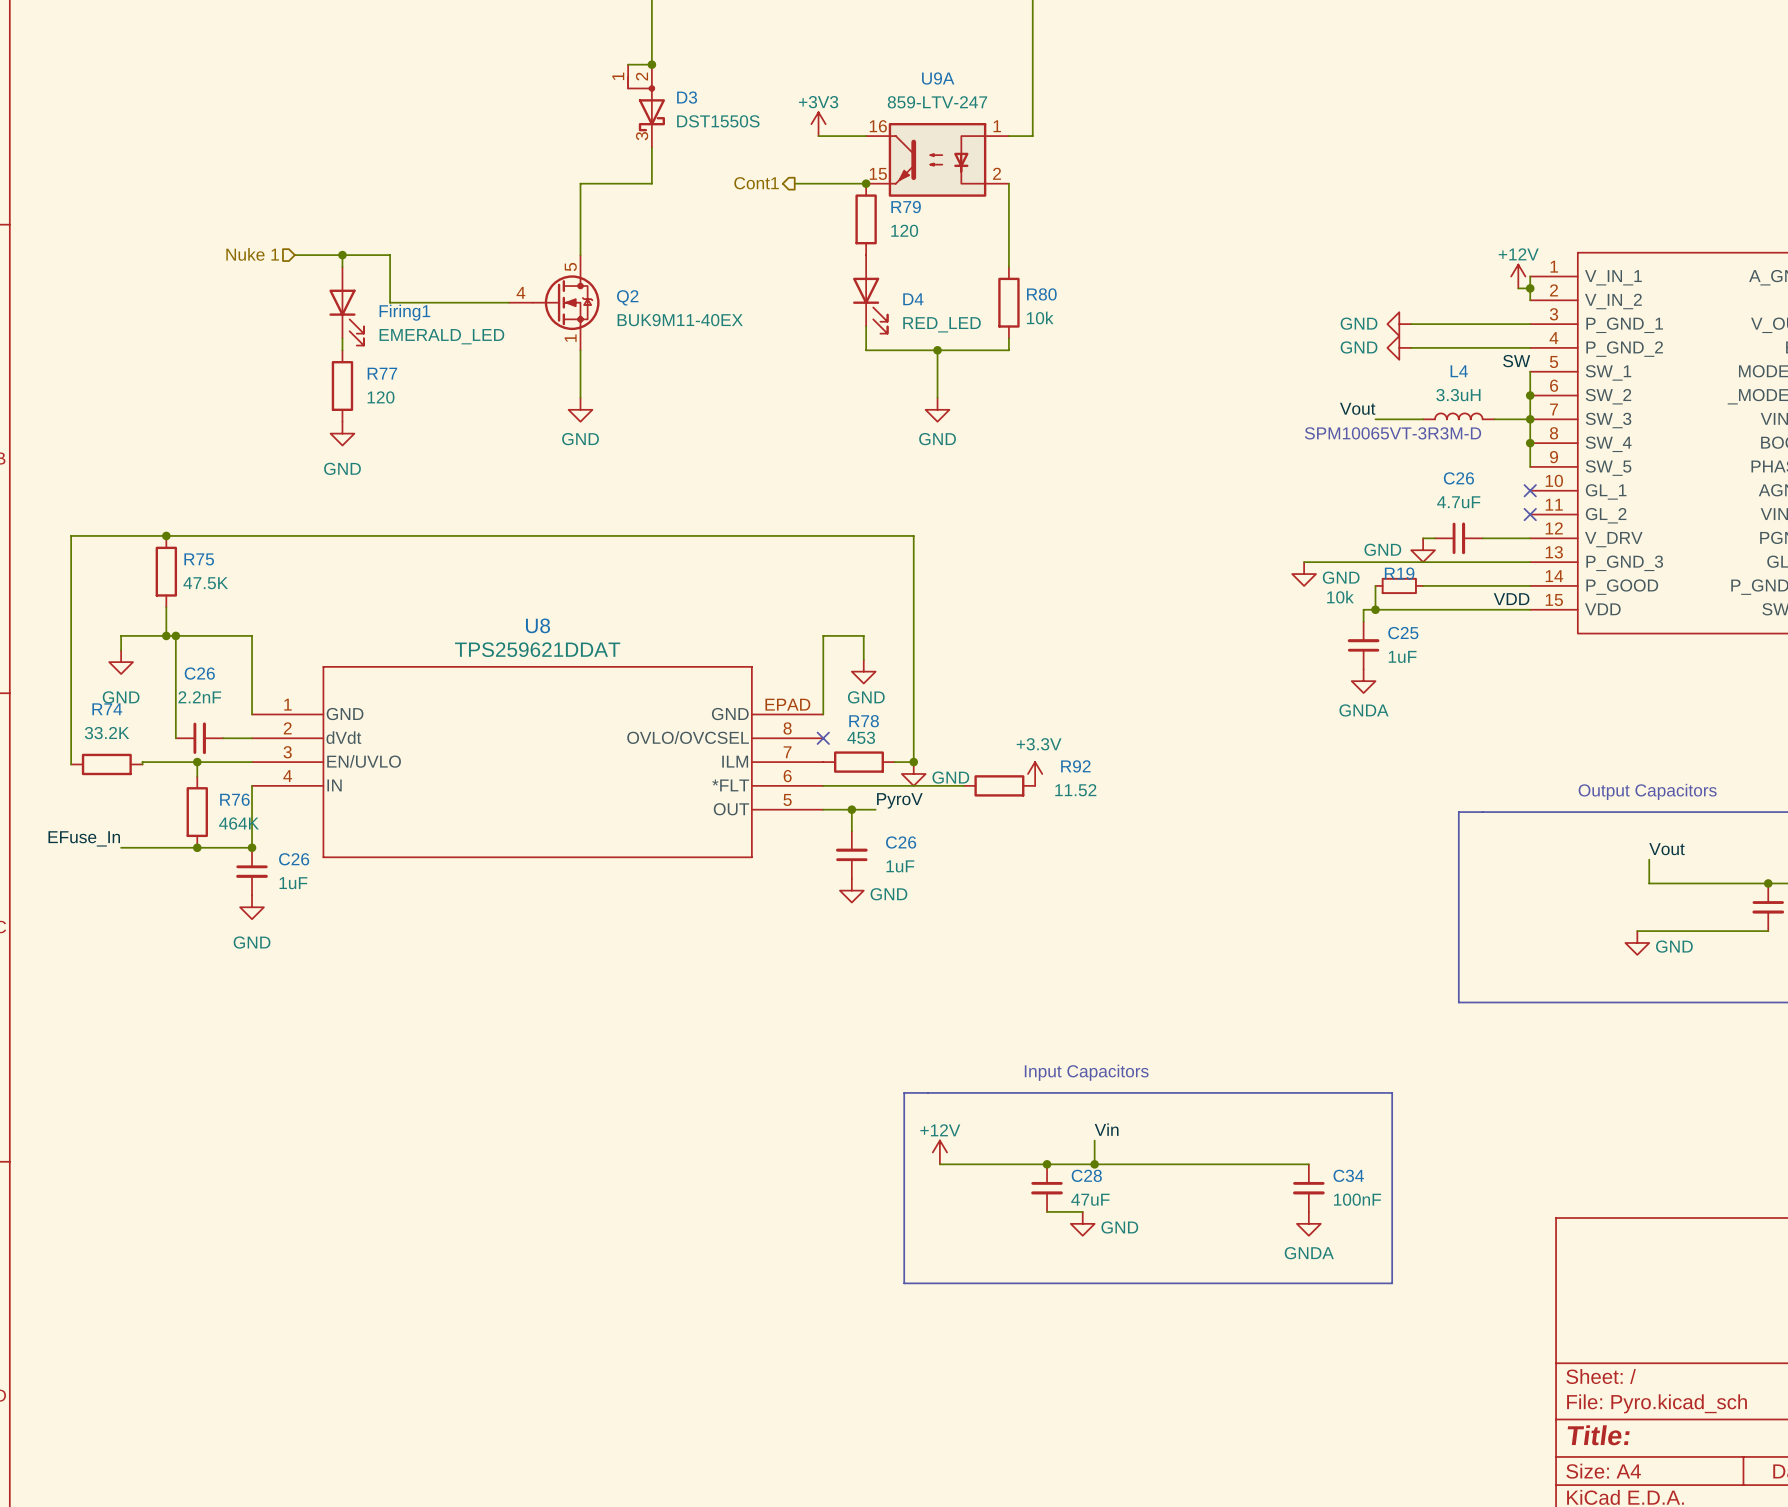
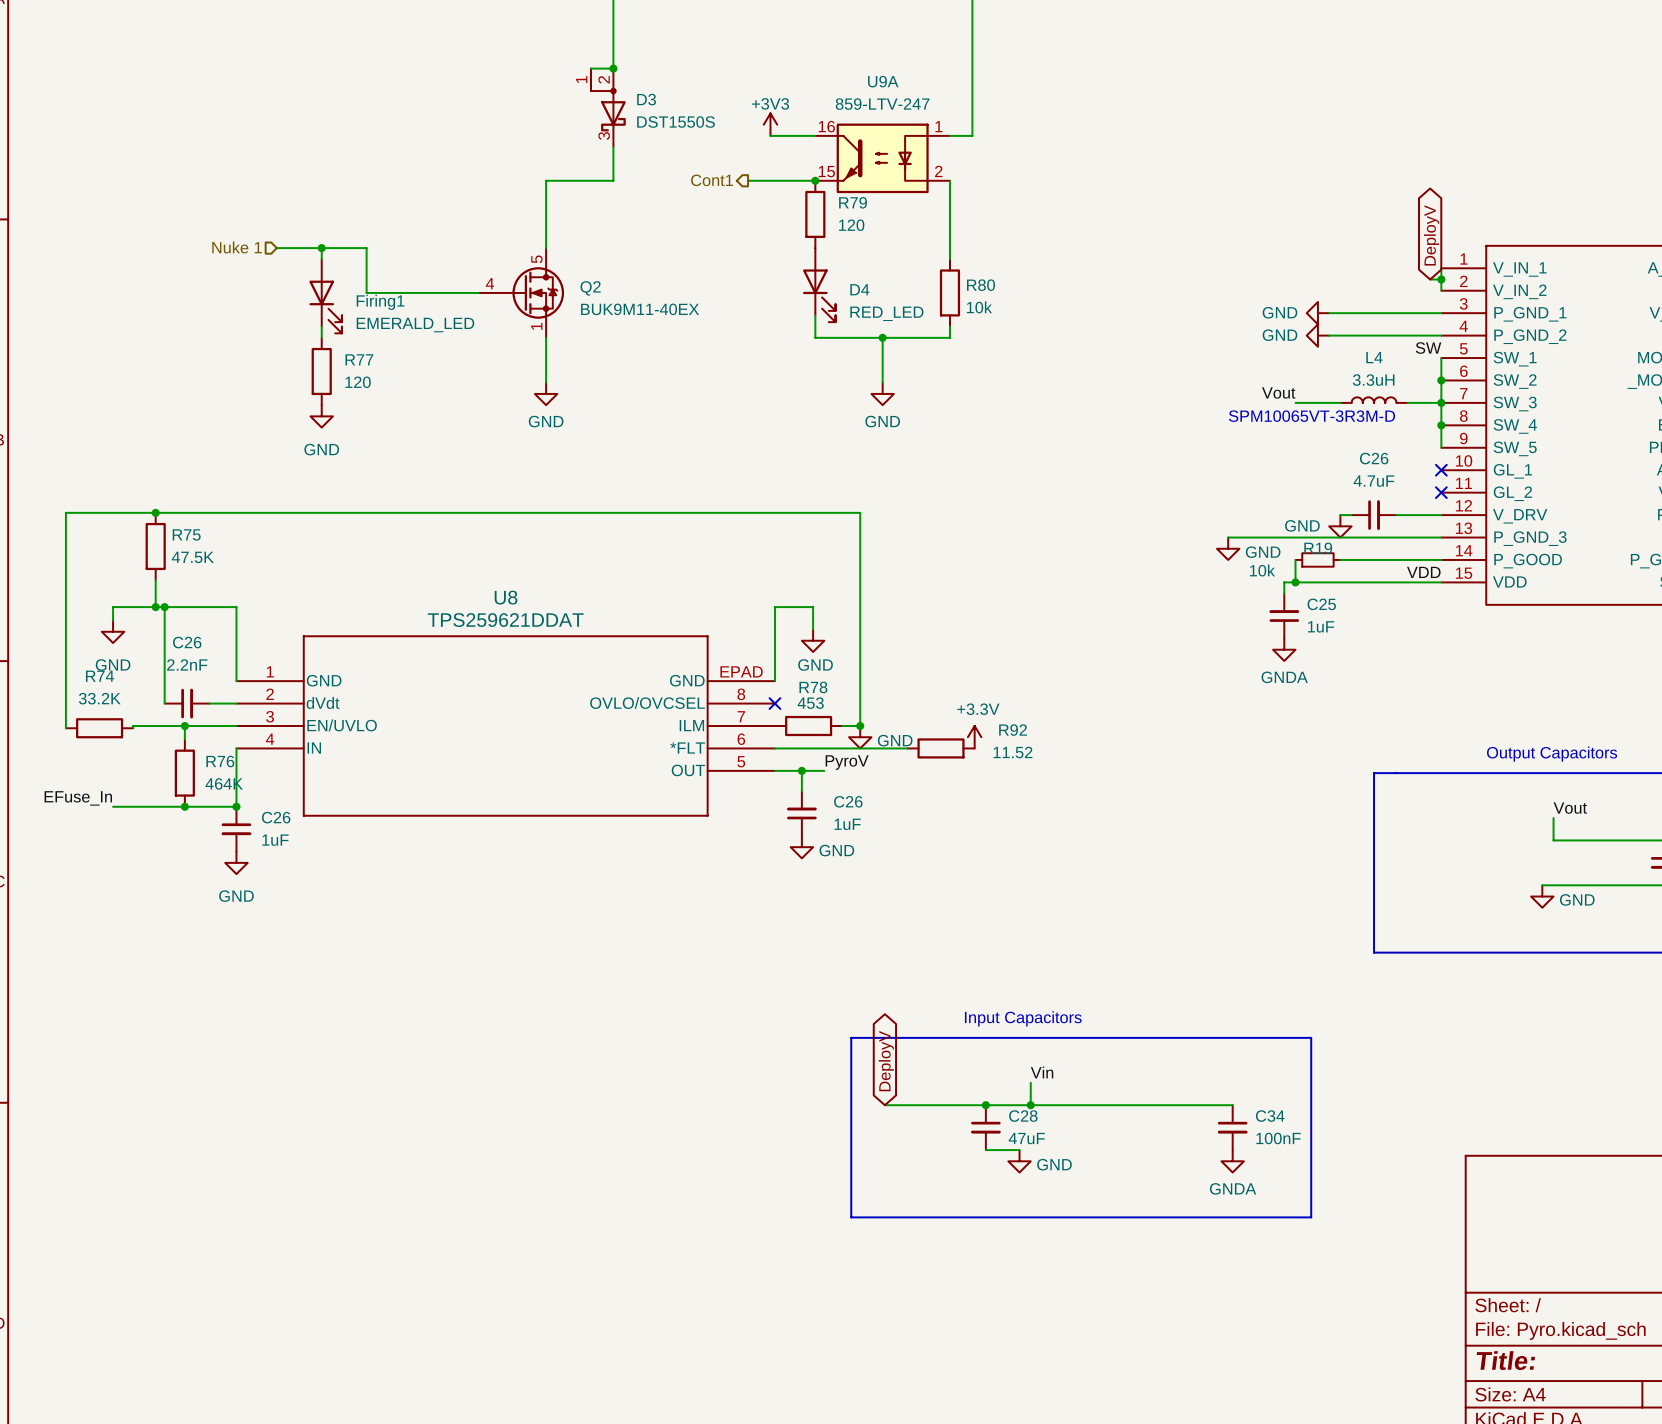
global label: none -> DeployV (1431, 235)
power symbol: +12V (1518, 276) -> none
global label: none -> DeployV (886, 1061)
power symbol: +12V (939, 1152) -> none

